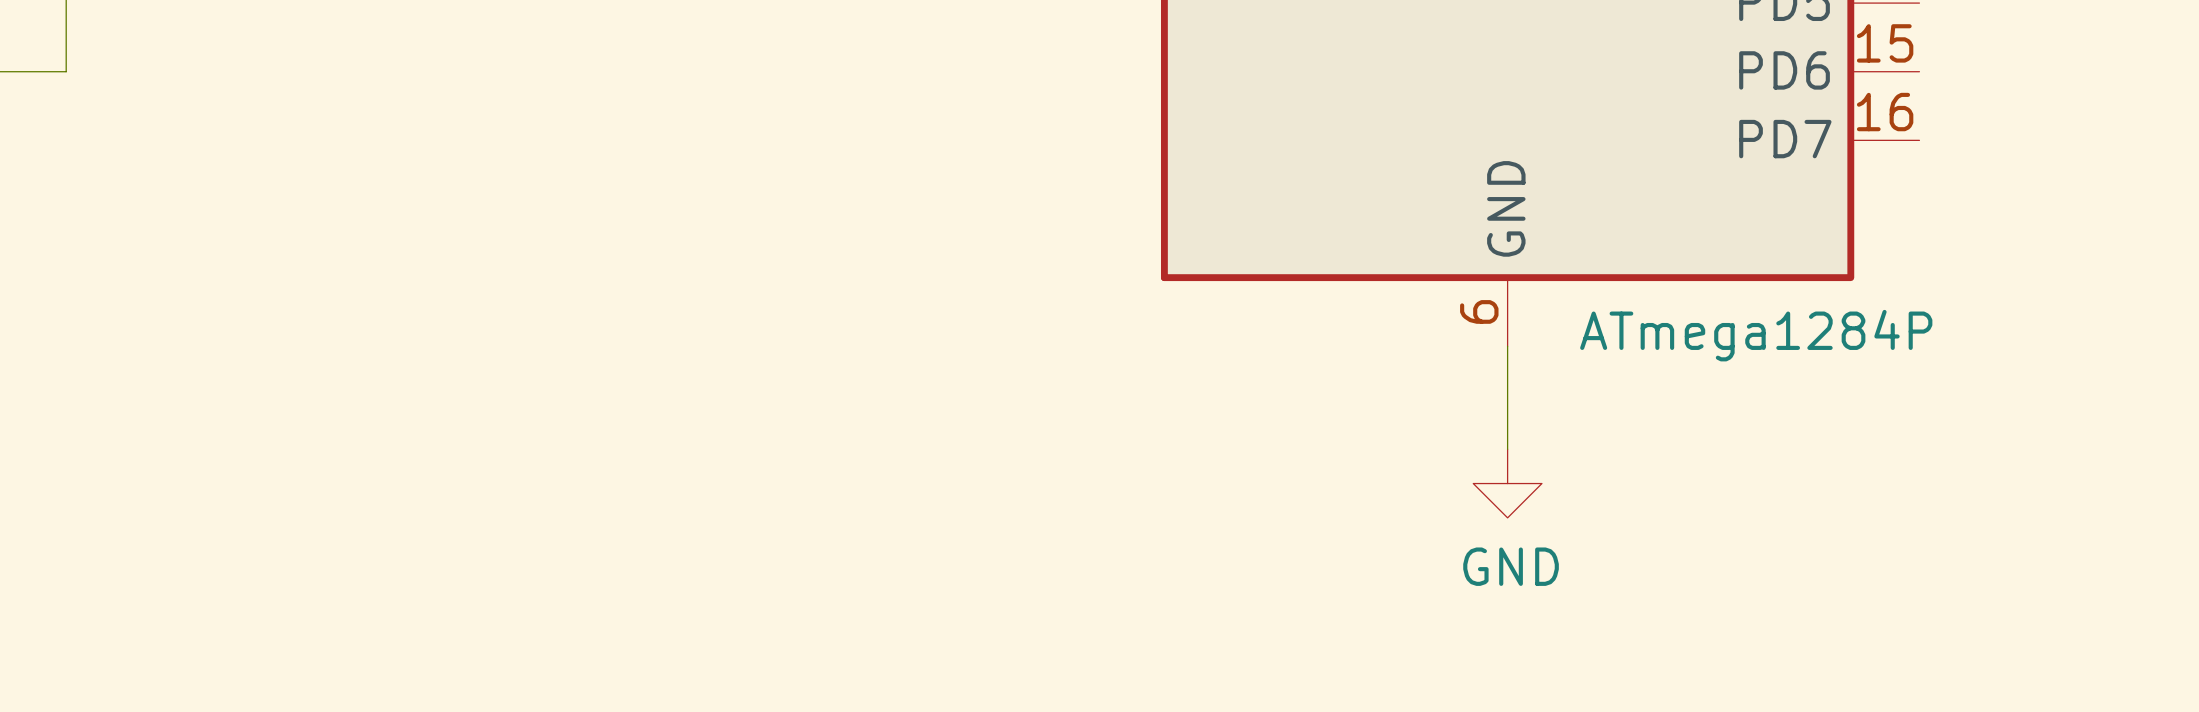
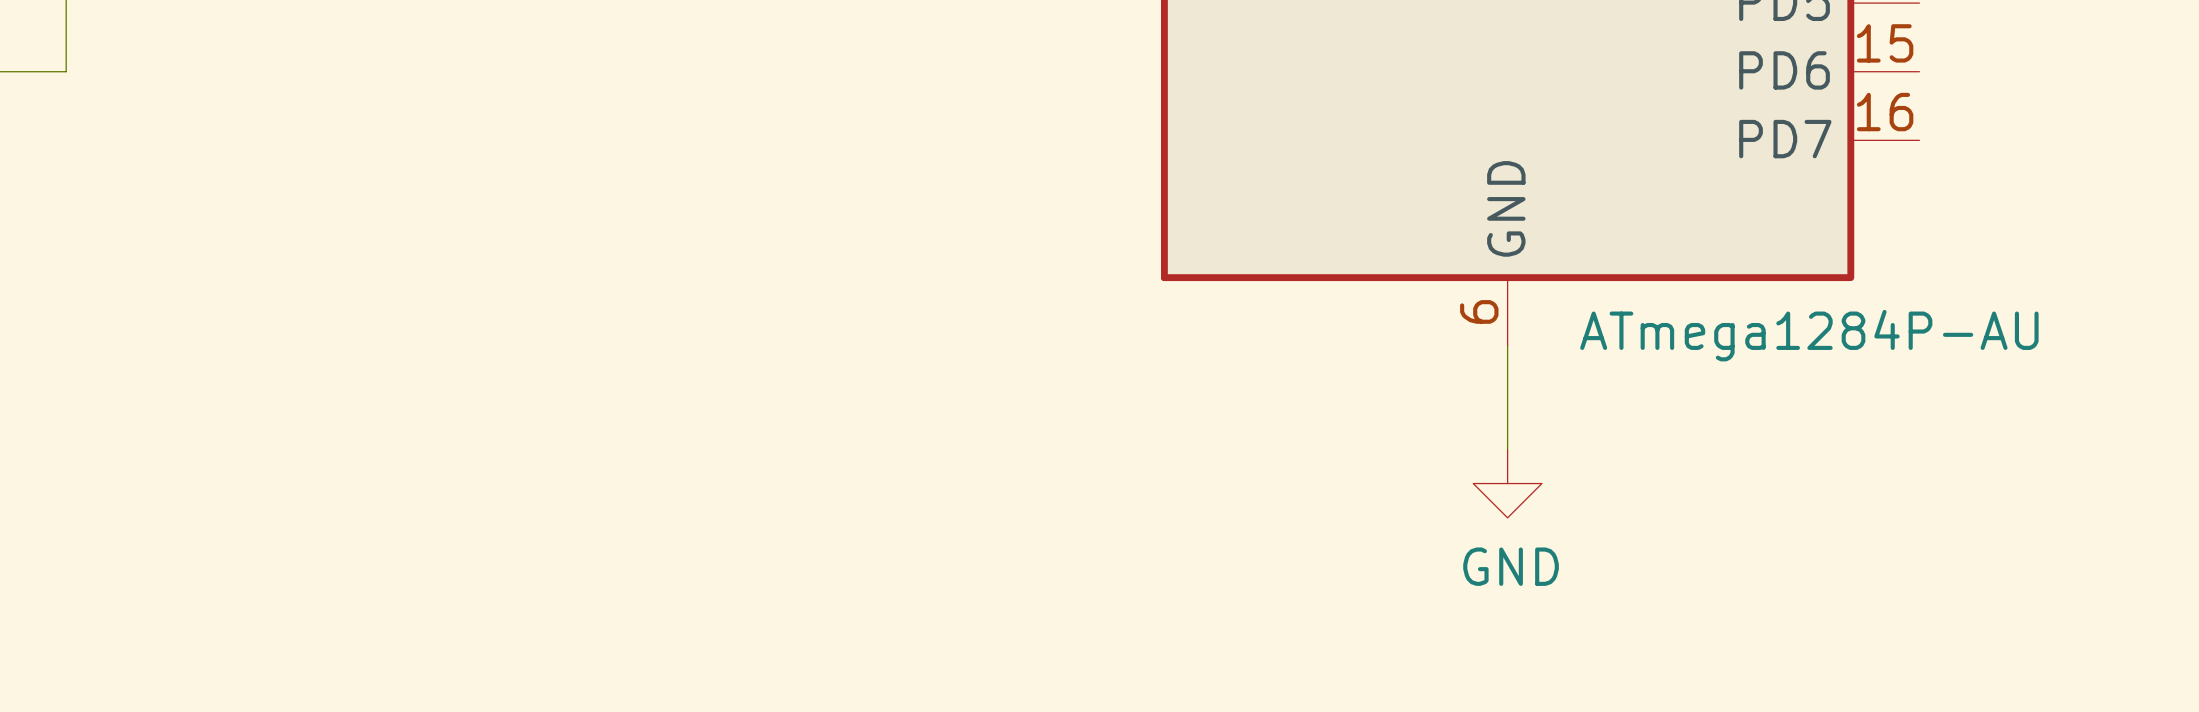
part value: ATmega1284P (1756, 335) -> ATmega1284P-AU (1809, 335)

